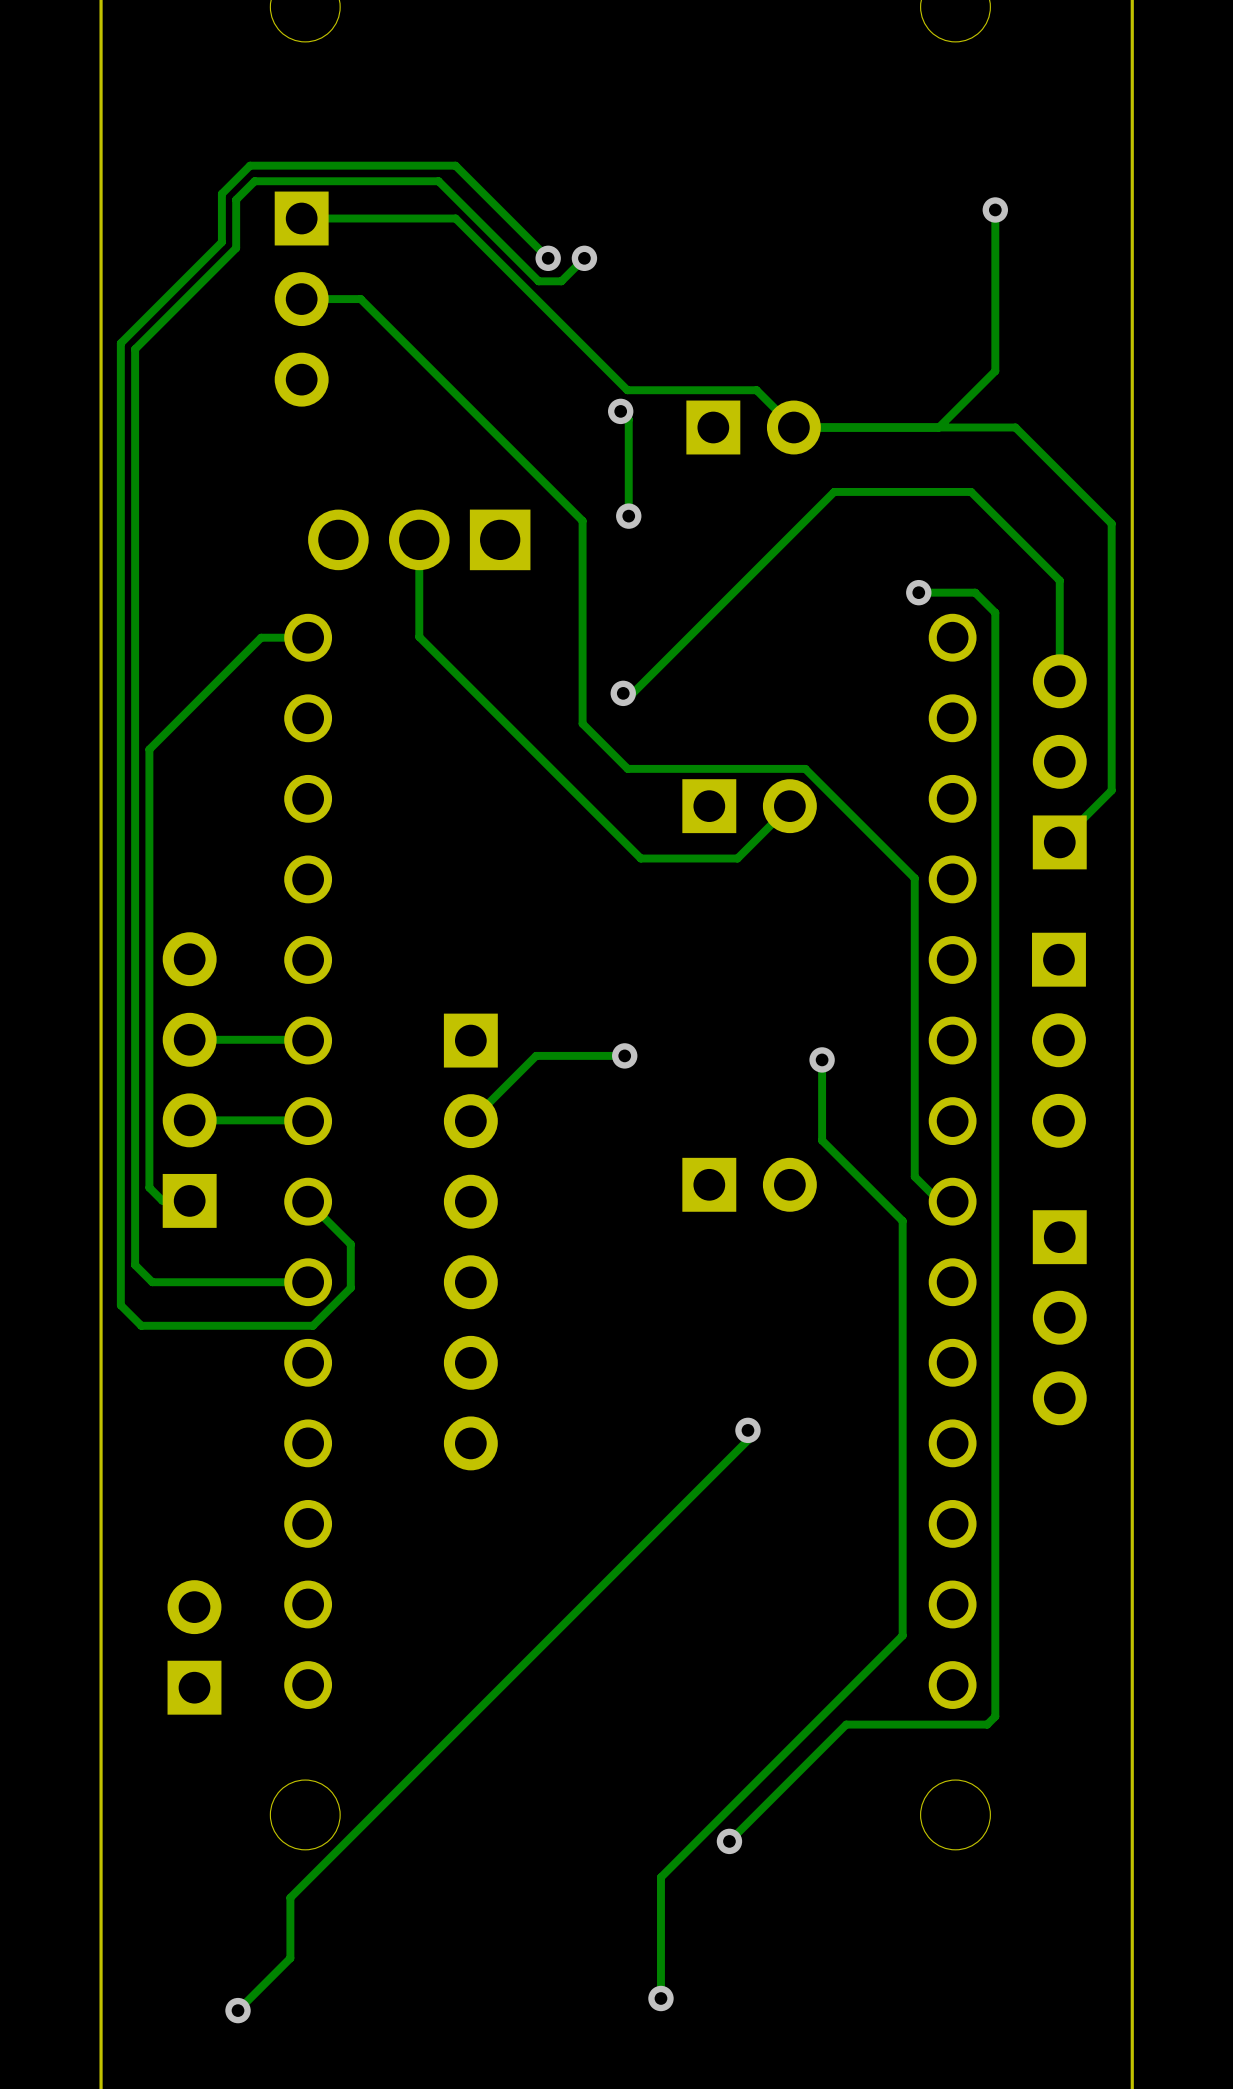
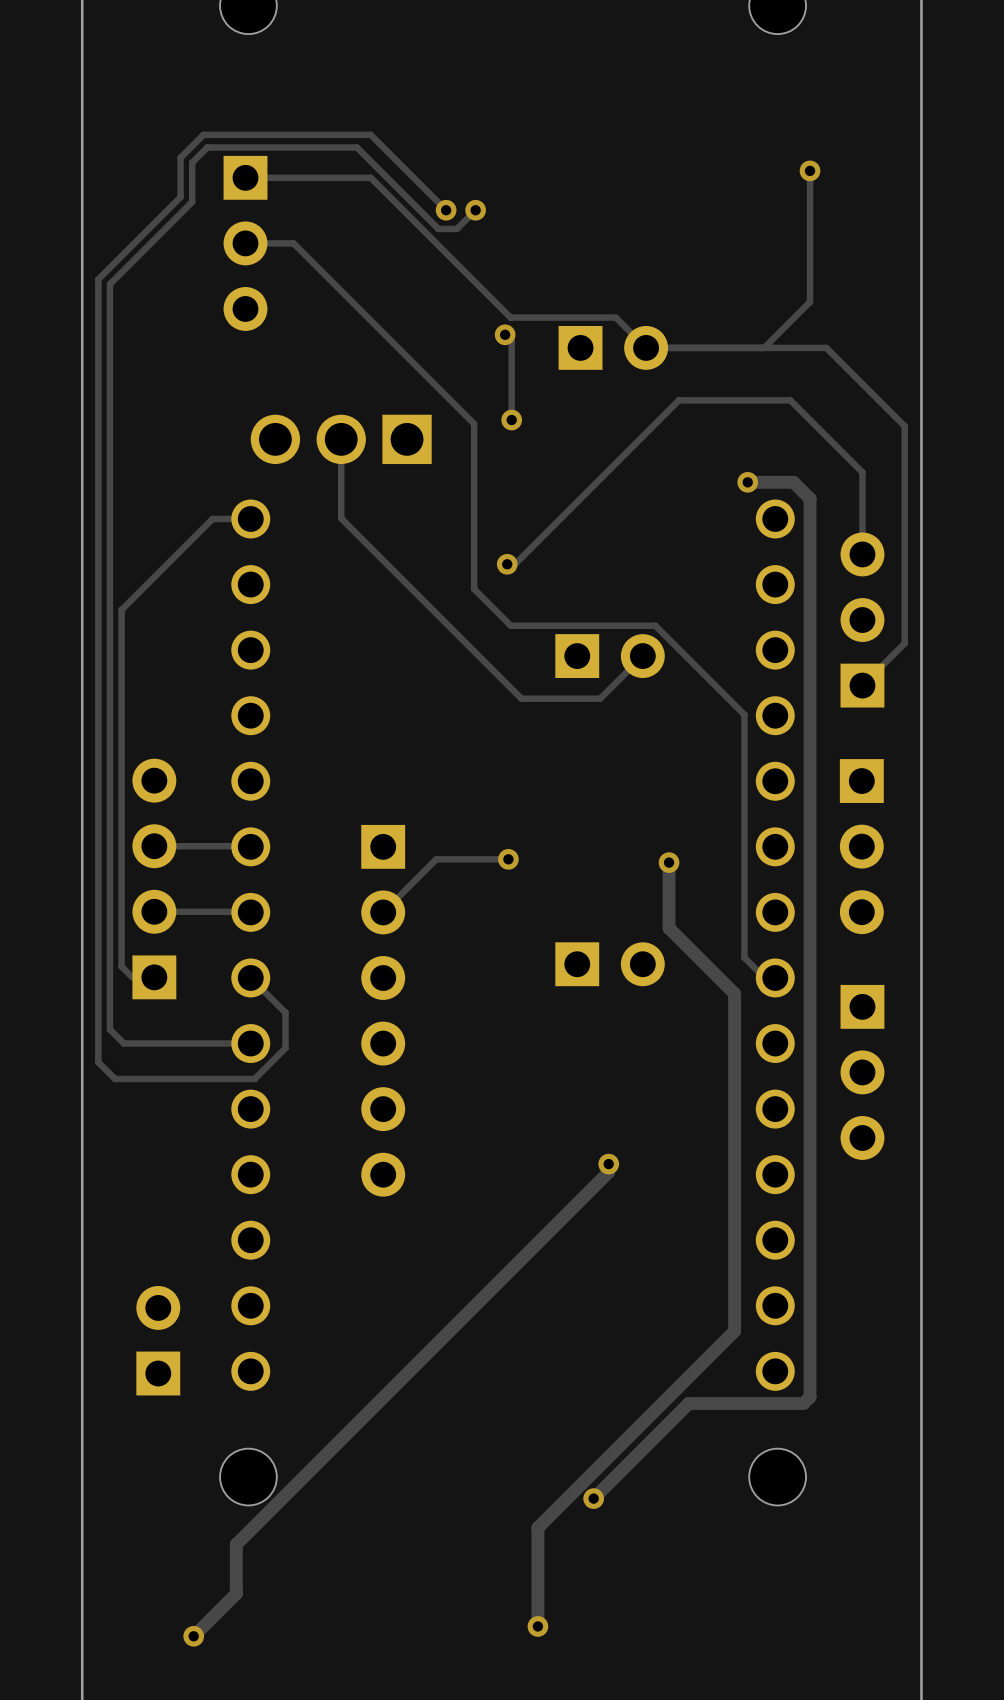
track width: thin (918, 592) (975, 592) (995, 612) (995, 1716) (987, 1724) (846, 1724) (729, 1841) -> thick (747, 482) (793, 482) (810, 498) (810, 1396) (803, 1403) (688, 1403) (593, 1498)
track width: thin (822, 1059) (822, 1140) (902, 1221) (902, 1635) (660, 1877) (660, 1998) -> thick (669, 862) (669, 928) (734, 993) (734, 1331) (537, 1527) (537, 1626)
track width: thin (747, 1430) (747, 1440) (290, 1897) (290, 1958) (238, 2010) -> thick (608, 1164) (608, 1172) (236, 1544) (236, 1593) (193, 1636)

